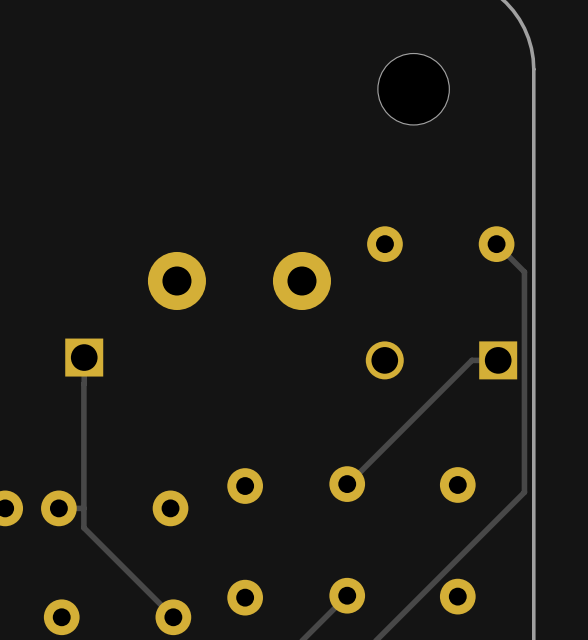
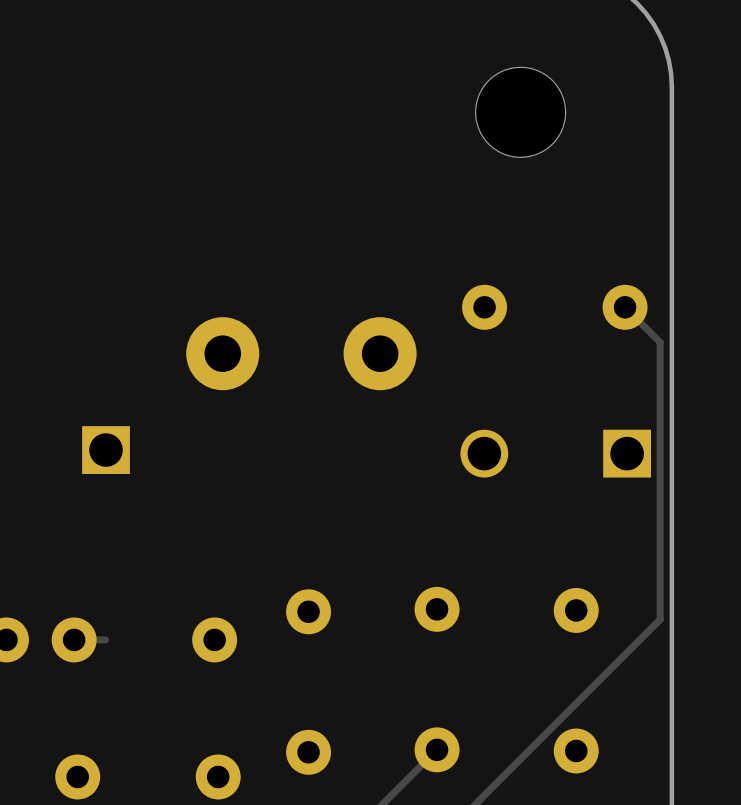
track: (84, 357) (83, 527) (173, 617) -> none
track: (498, 360) (471, 360) (347, 484) -> none

